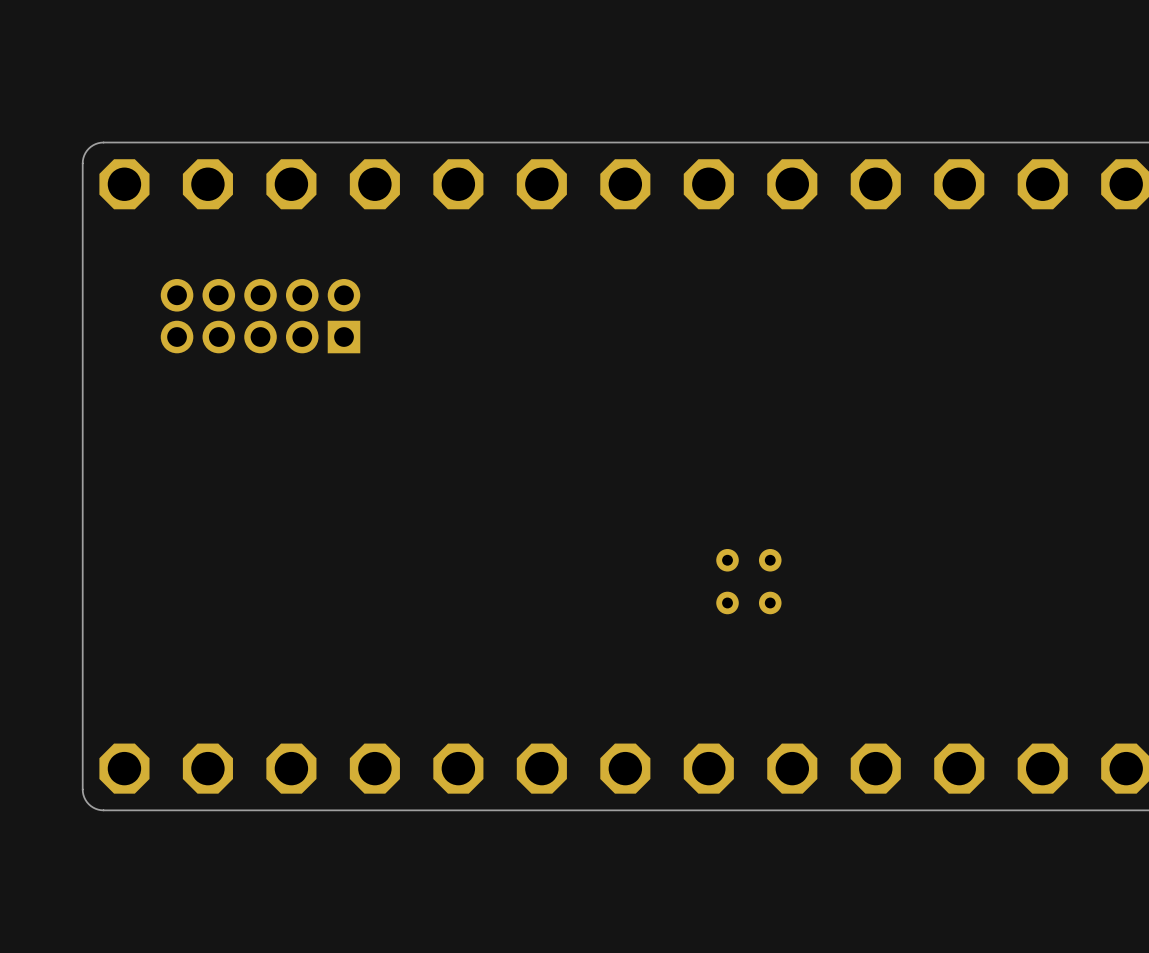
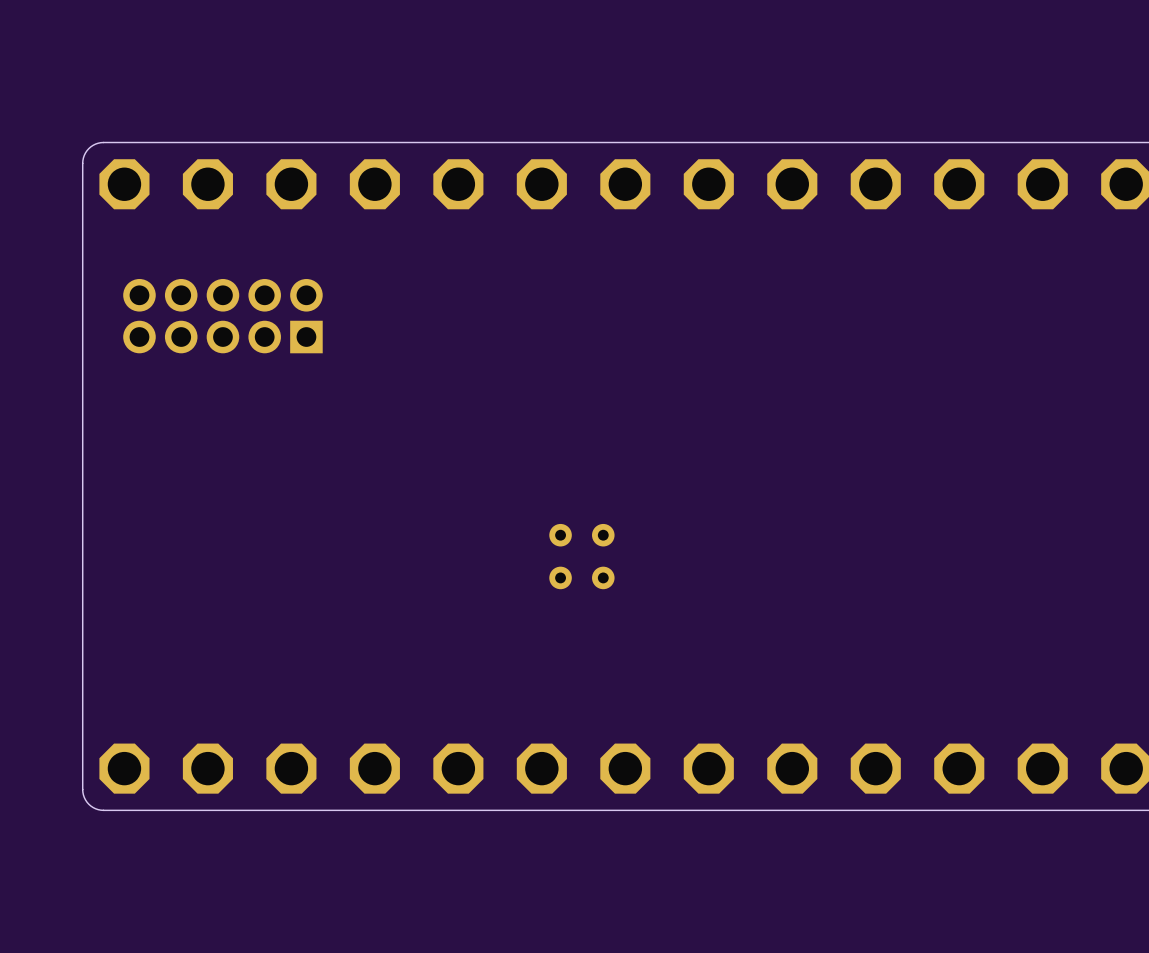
part position: (260, 316) -> (222, 316)
part position: (748, 581) -> (581, 556)

